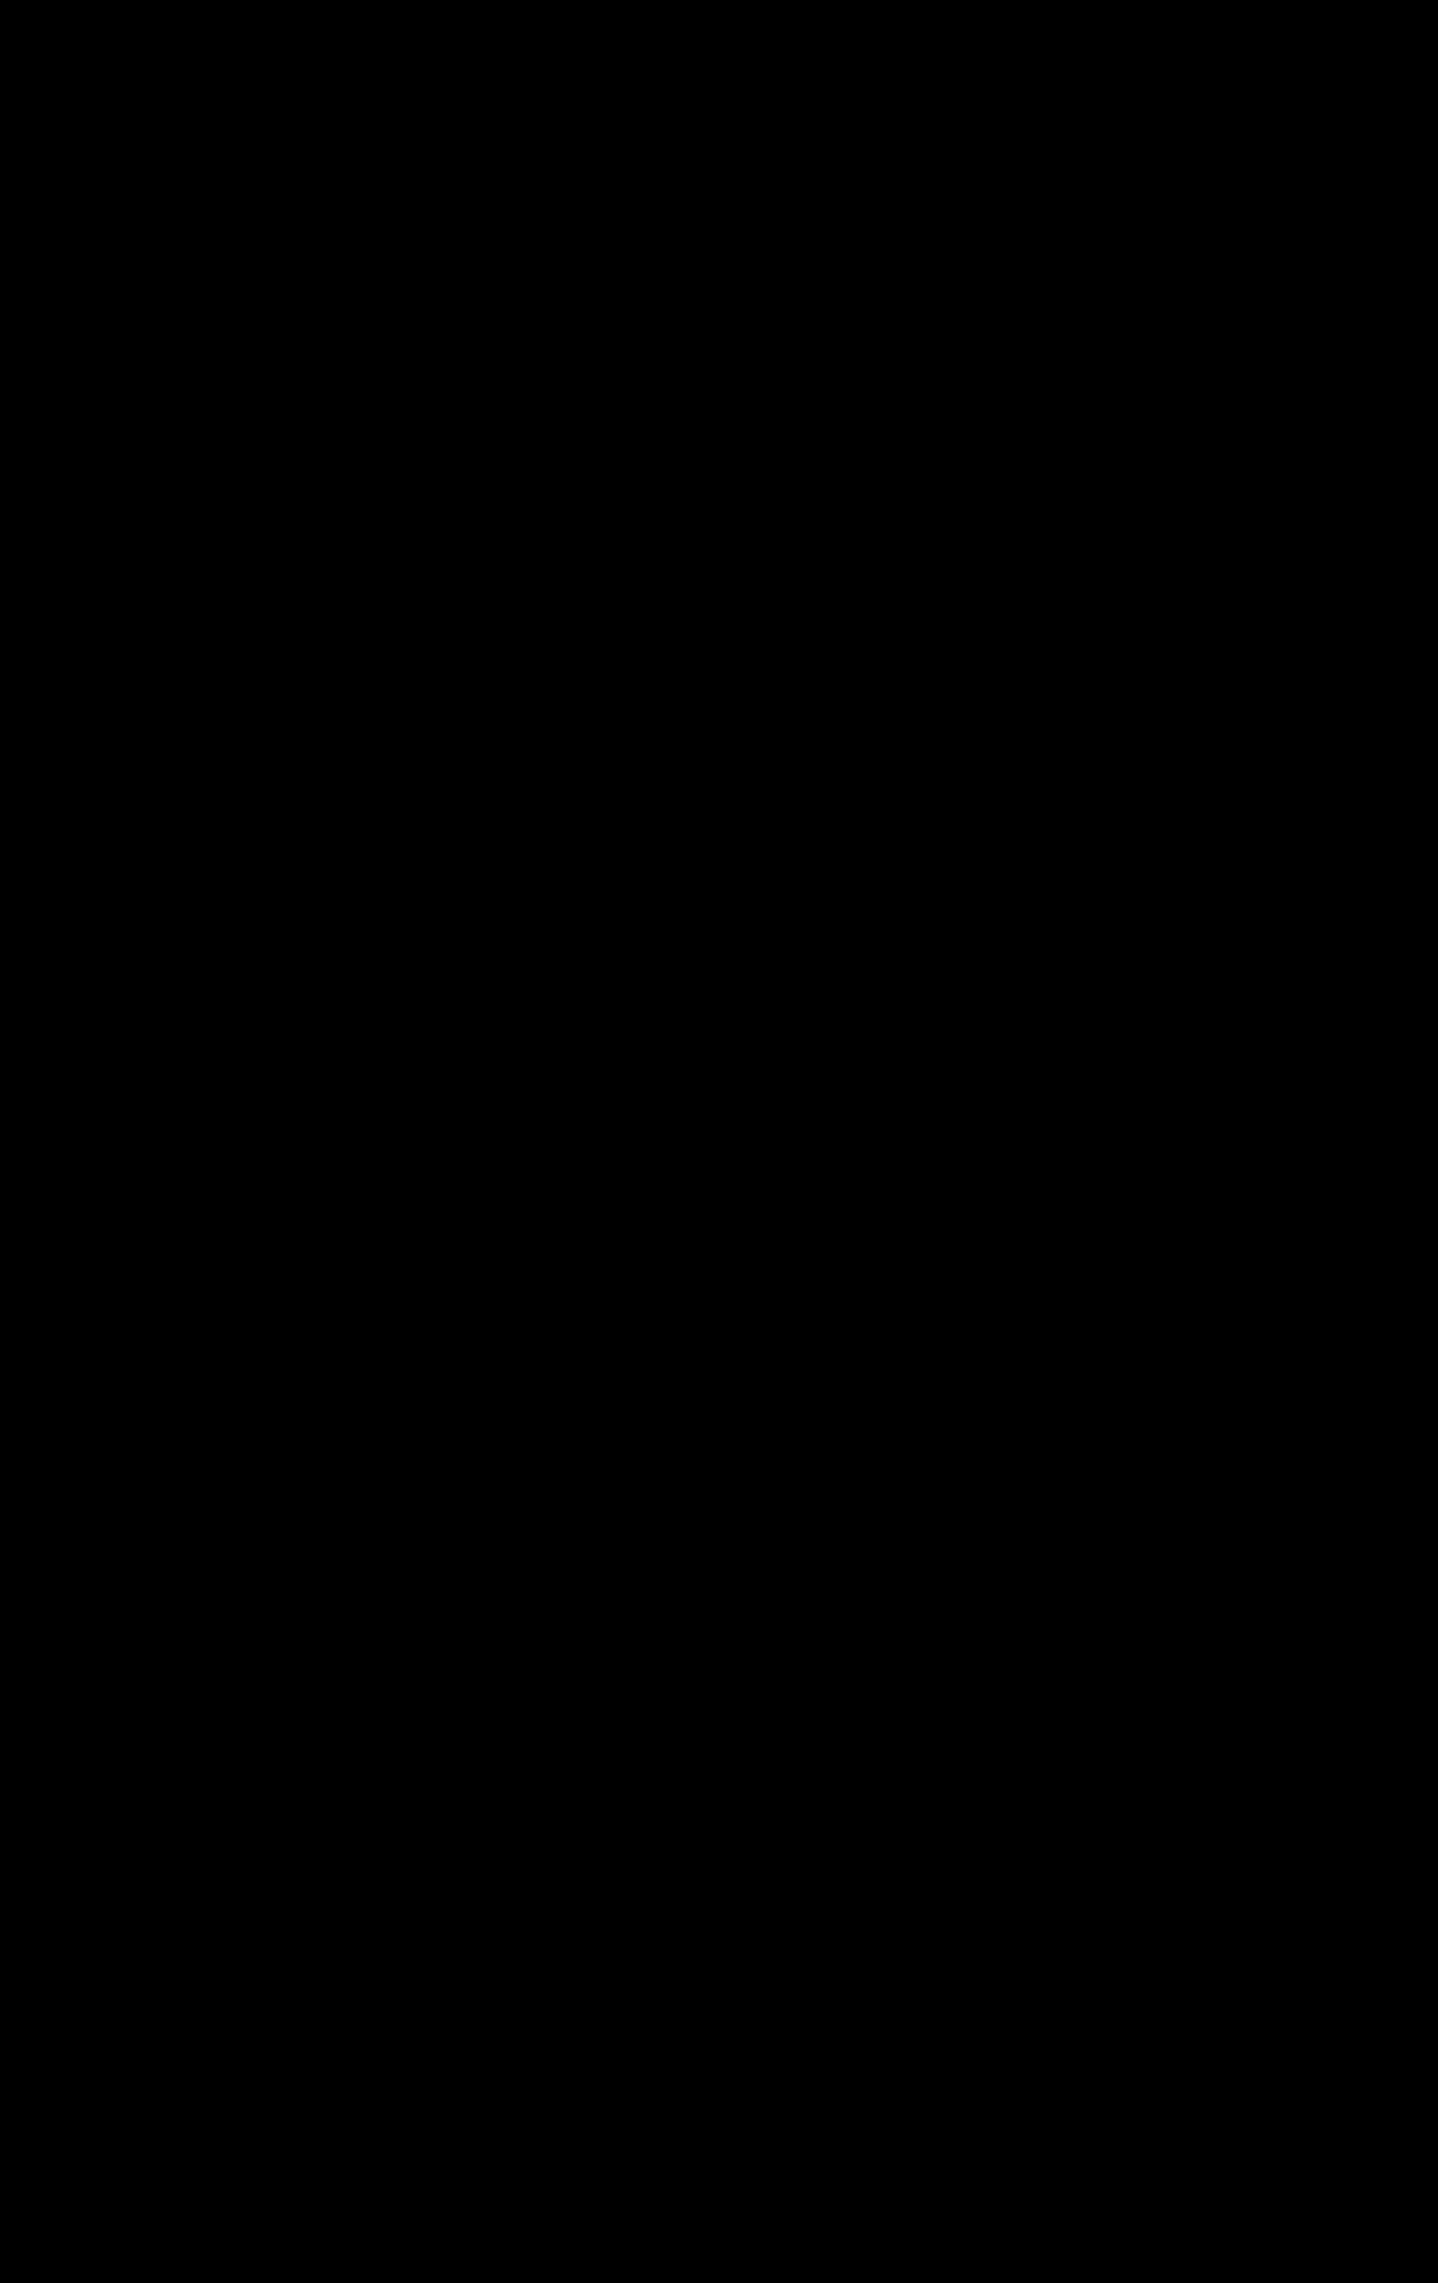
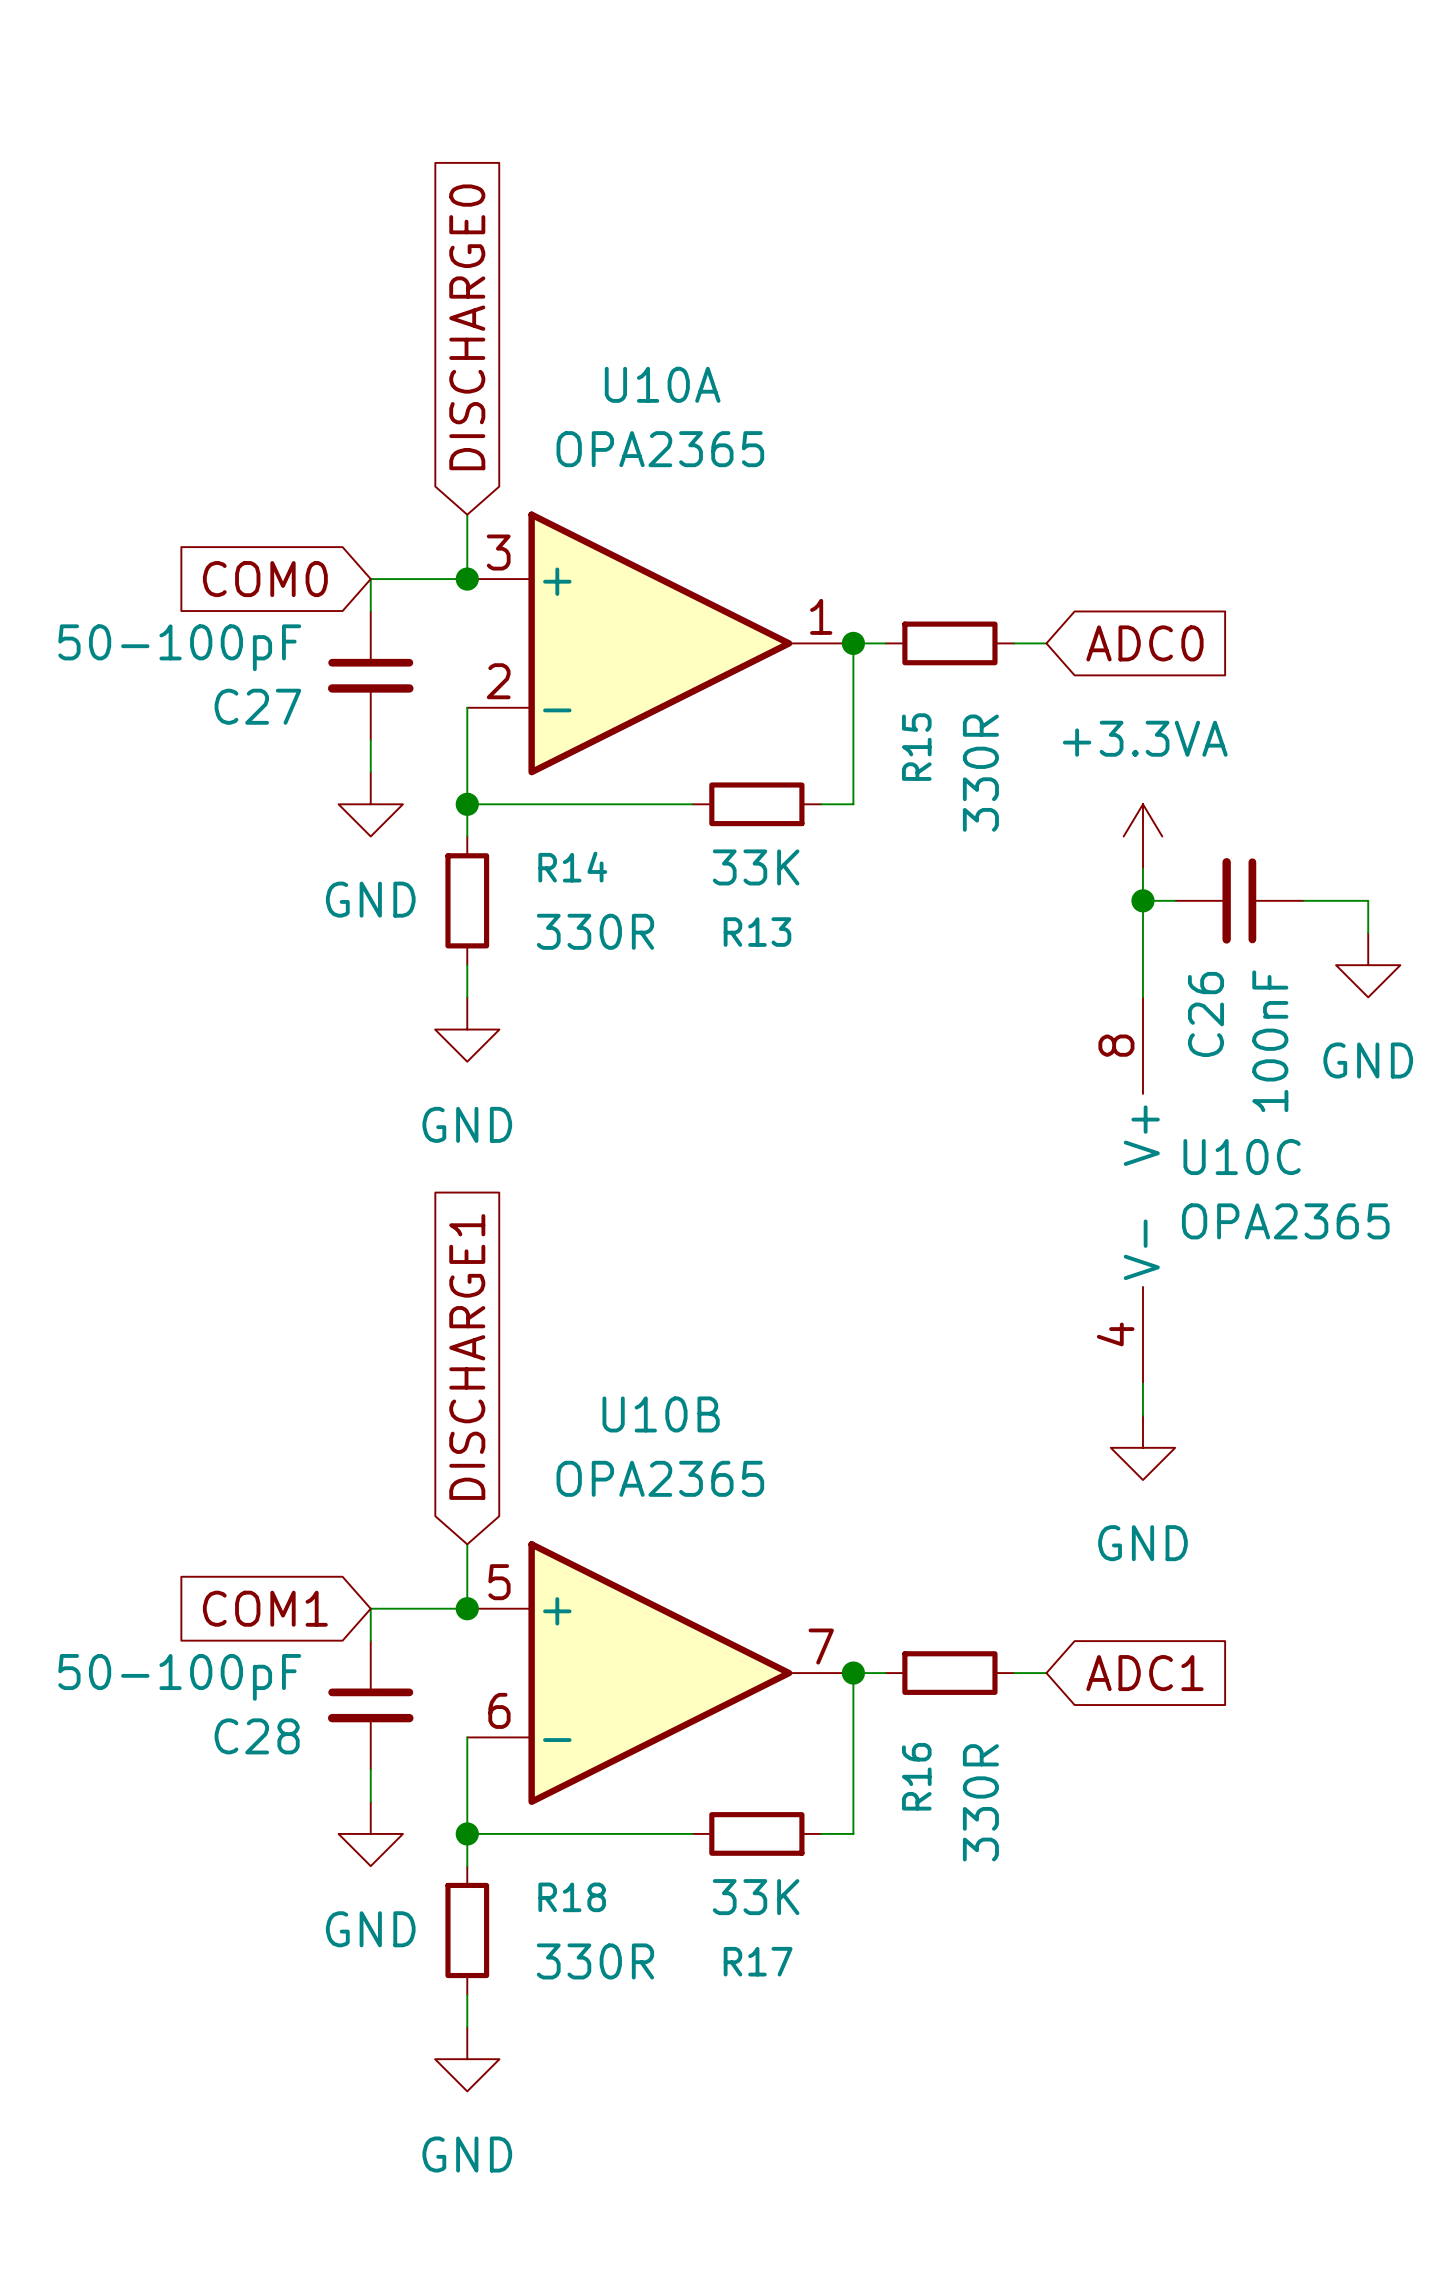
global label: none -> DISCHARGE0 (467, 327)
wire: none -> (467, 514) (467, 579) (370, 579) (370, 611)
global label: none -> COM0 (265, 579)
junction: none -> (467, 579)
U10A: none -> OPA2365 (660, 643)
junction: none -> (853, 643)
wire: none -> (885, 643) (853, 643) (853, 804) (821, 804)
R15: none -> 330R (949, 643)
wire: none -> (1014, 643) (1046, 643)
global label: none -> ADC0 (1144, 643)
C27: none -> 50-100pF (370, 675)
wire: none -> (467, 707) (467, 836)
wire: none -> (370, 739) (370, 772)
power symbol: none -> GND (370, 804)
wire: none -> (467, 804) (692, 804)
junction: none -> (467, 804)
R13: none -> 33K (756, 804)
power symbol: none -> +3.3VA (1142, 836)
wire: none -> (1142, 868) (1142, 997)
R14: none -> 330R (467, 900)
wire: none -> (1142, 900) (1175, 900)
junction: none -> (1142, 900)
C26: none -> 100nF (1239, 900)
wire: none -> (1303, 900) (1368, 900) (1368, 933)
wire: none -> (467, 965) (467, 997)
power symbol: none -> GND (1368, 965)
power symbol: none -> GND (467, 1029)
U10C: none -> OPA2365 (1142, 1190)
global label: none -> DISCHARGE1 (467, 1357)
wire: none -> (1142, 1383) (1142, 1415)
power symbol: none -> GND (1142, 1447)
wire: none -> (467, 1544) (467, 1608) (370, 1608) (370, 1640)
global label: none -> COM1 (265, 1608)
junction: none -> (467, 1608)
U10B: none -> OPA2365 (660, 1673)
junction: none -> (853, 1673)
wire: none -> (885, 1673) (853, 1673) (853, 1833) (821, 1833)
R16: none -> 330R (949, 1673)
wire: none -> (1014, 1673) (1046, 1673)
global label: none -> ADC1 (1144, 1673)
C28: none -> 50-100pF (370, 1705)
wire: none -> (467, 1737) (467, 1866)
wire: none -> (370, 1769) (370, 1801)
power symbol: none -> GND (370, 1833)
wire: none -> (467, 1833) (692, 1833)
junction: none -> (467, 1833)
R17: none -> 33K (756, 1833)
R18: none -> 330R (467, 1930)
wire: none -> (467, 1994) (467, 2027)
power symbol: none -> GND (467, 2059)

